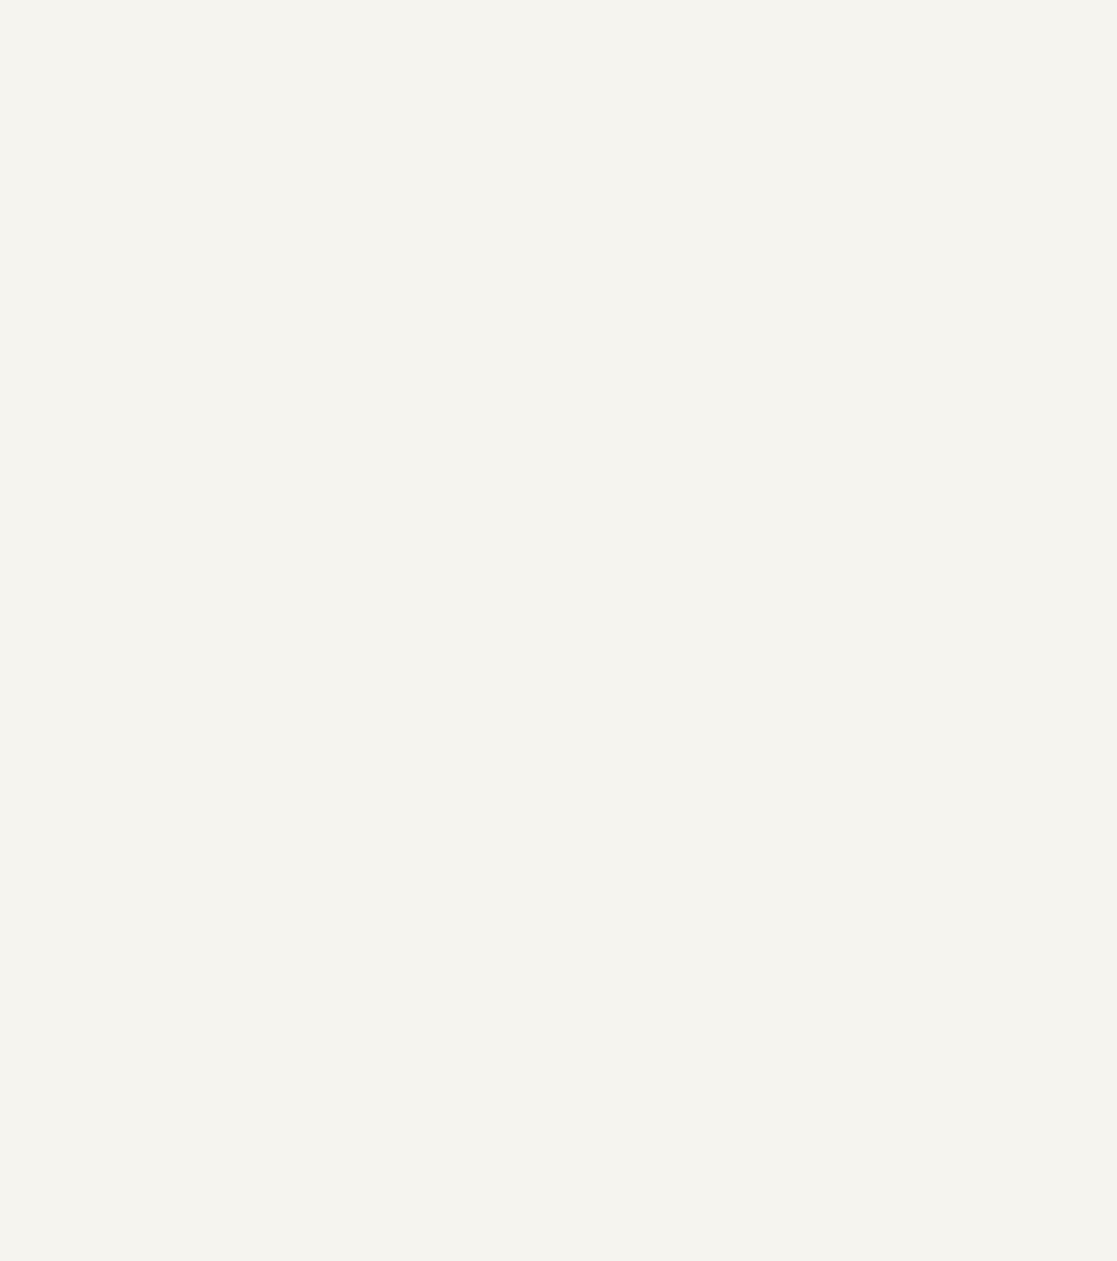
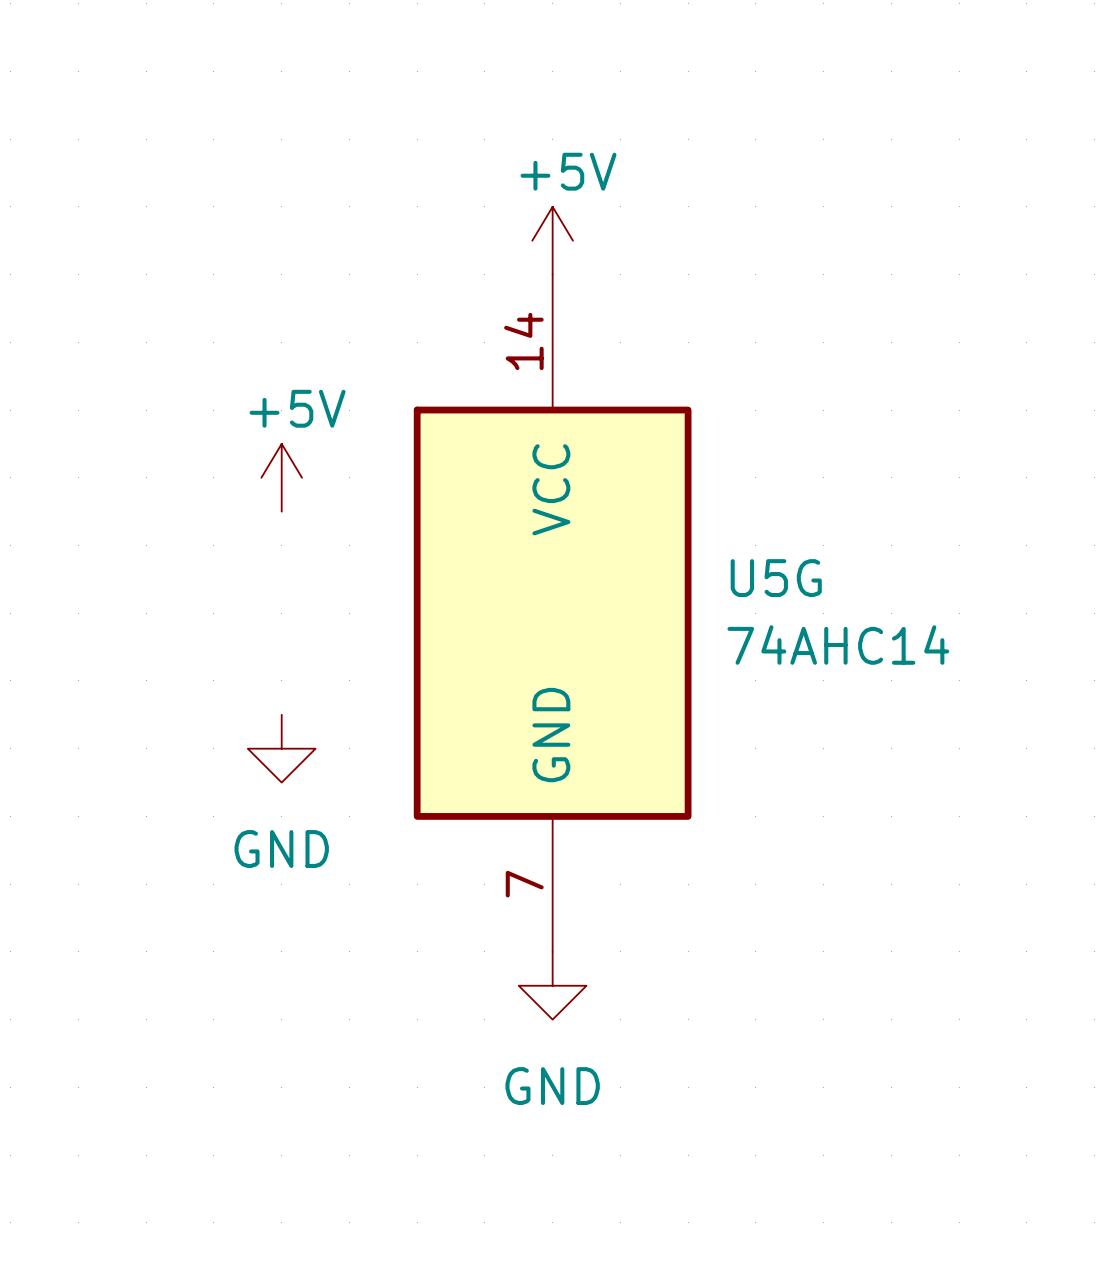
power symbol: none -> +5V (552, 240)
power symbol: none -> +5V (281, 477)
U5G: none -> 74AHC14 (552, 613)
power symbol: none -> GND (281, 748)
power symbol: none -> GND (552, 985)

